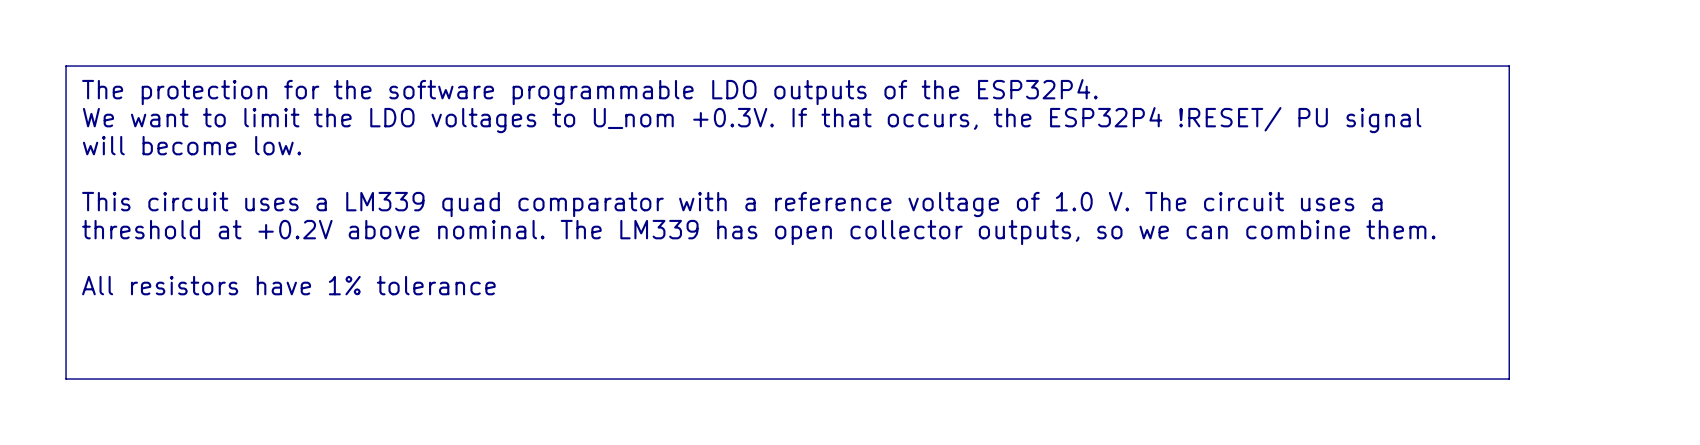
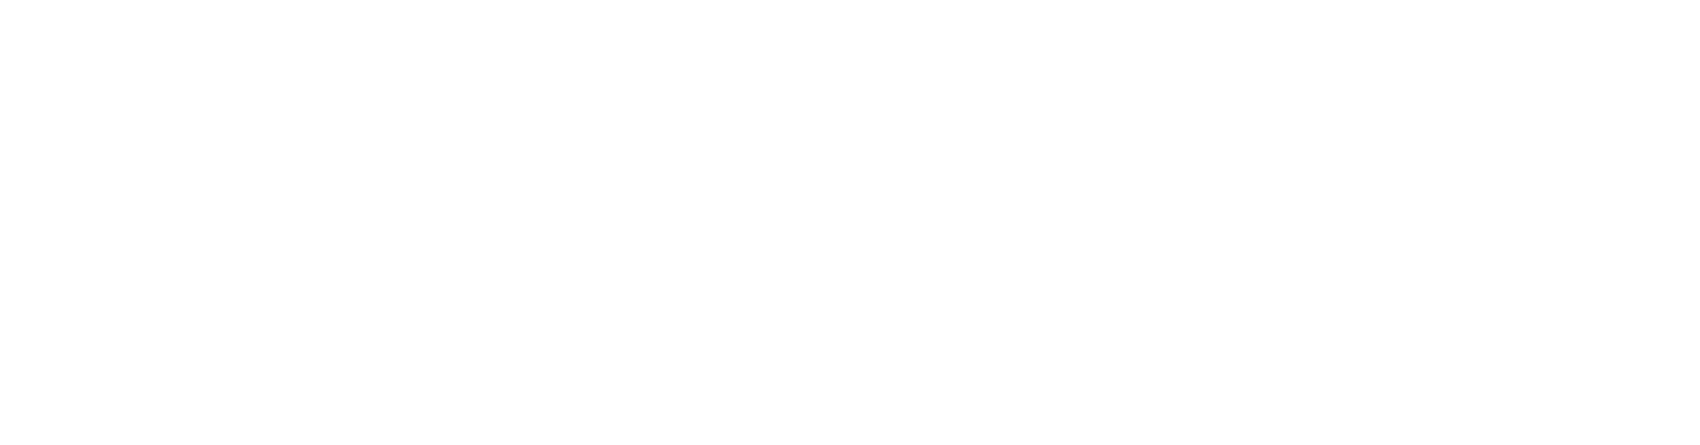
line: (66, 66) (1509, 66) (1509, 379) (66, 379) (66, 66) -> none
text: The protection for the software programmable LDO outputs of the ESP32P4. (589, 92) -> none
text: We want to limit the LDO voltages to U_nom +0.3V. If that occurs, the ESP32P4 !RESET/ PU signal (752, 120) -> none
text: will become low. (192, 145) -> none
text: This circuit uses a LM339 quad comparator with a reference voltage of 1.0 V. The circuit uses a (732, 204) -> none
text: threshold at +0.2V above nominal. The LM339 has open collector outputs, so we can combine them. (758, 232) -> none
text: All resistors have 1% tolerance (288, 285) -> none

